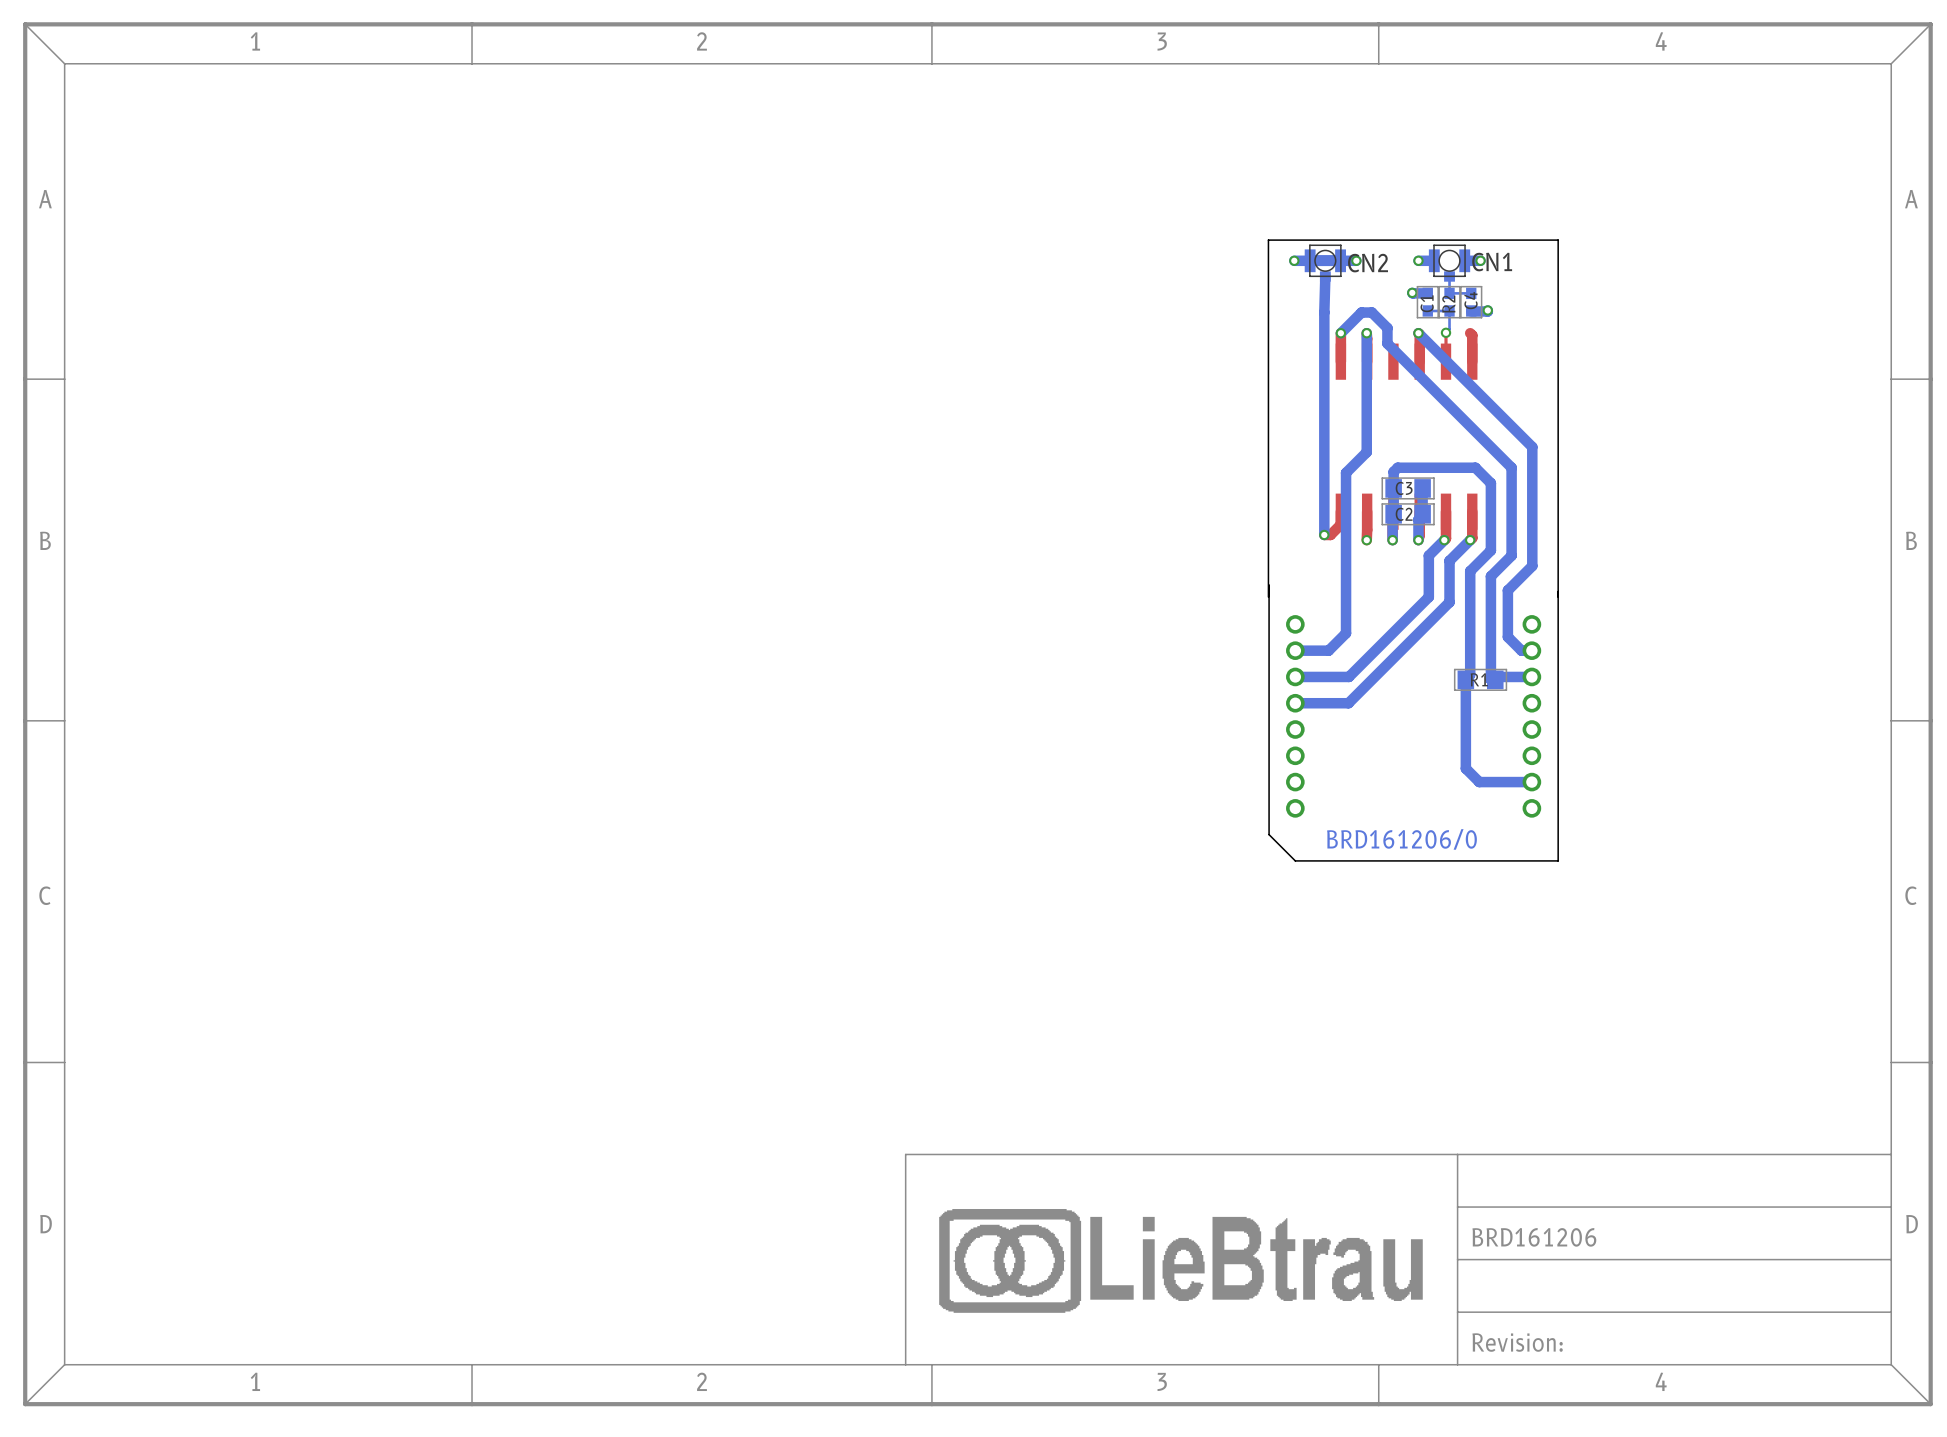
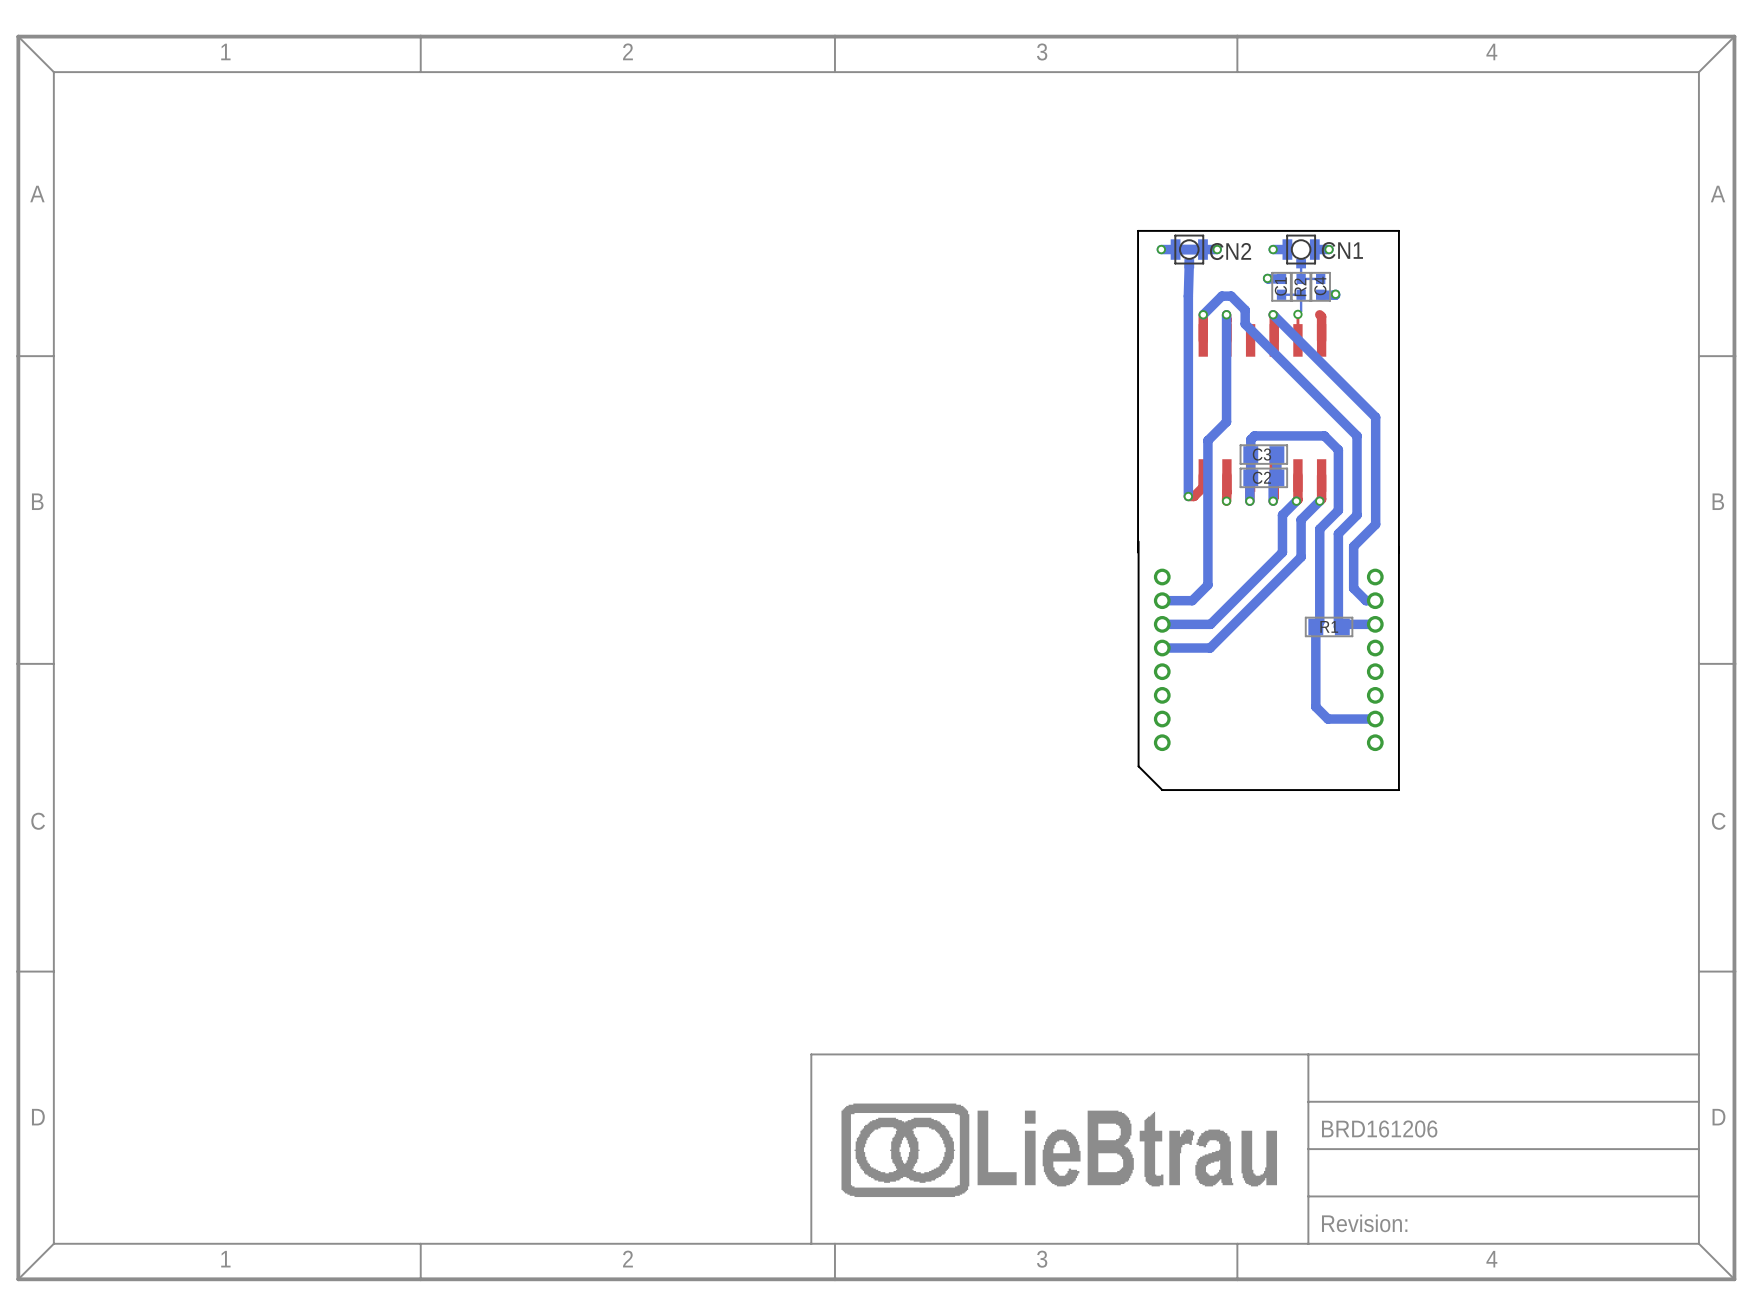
text: BRD161206/0 (1401, 839) -> none

